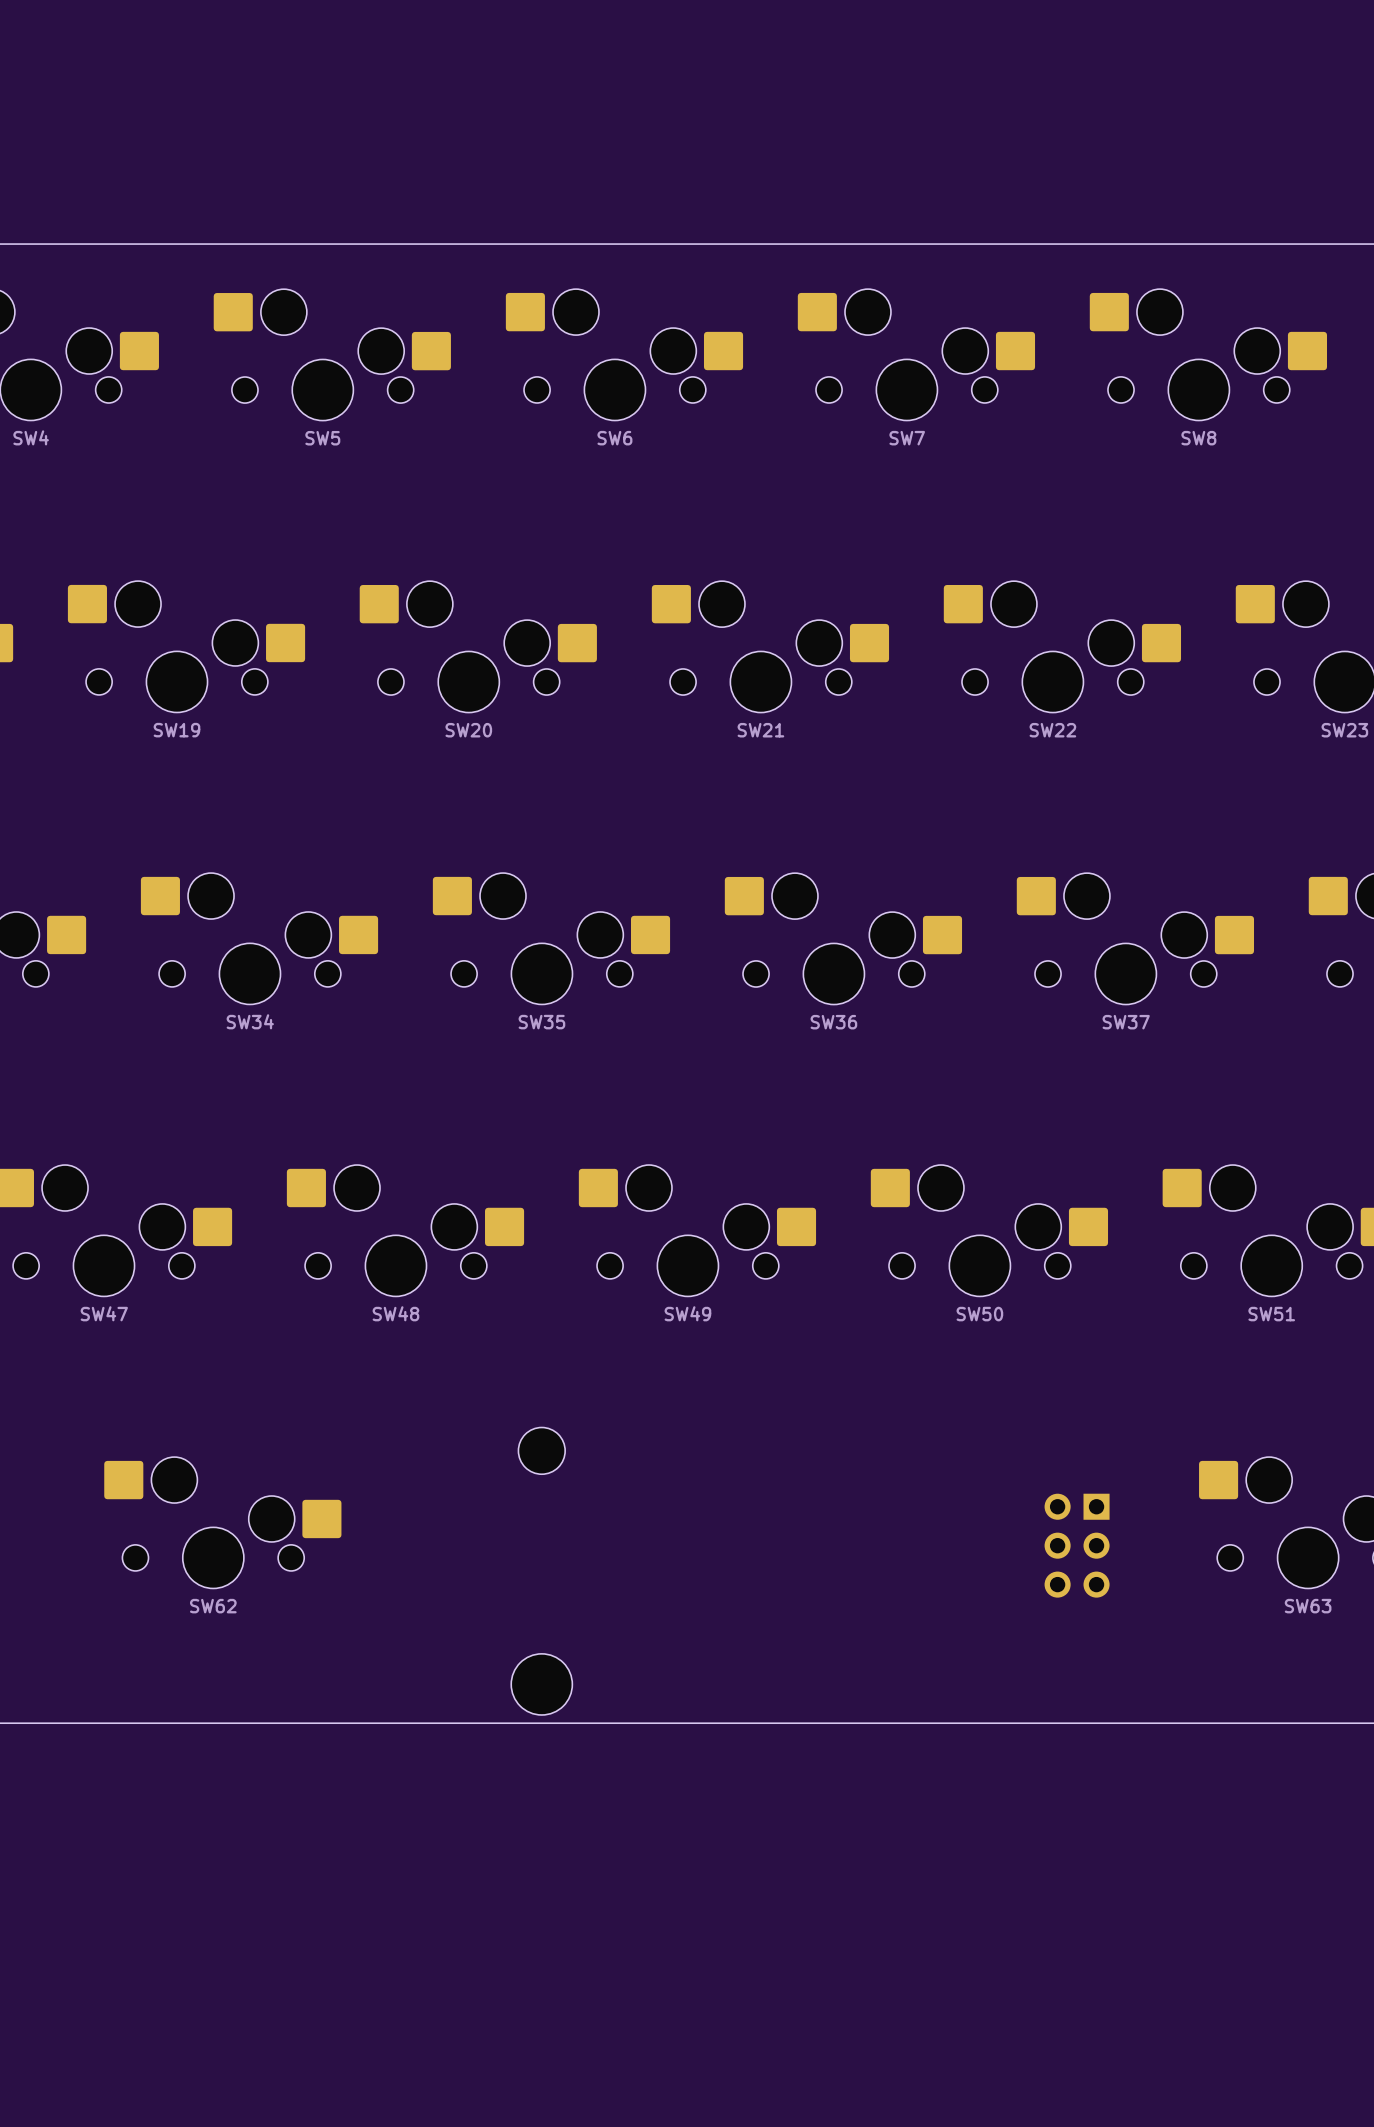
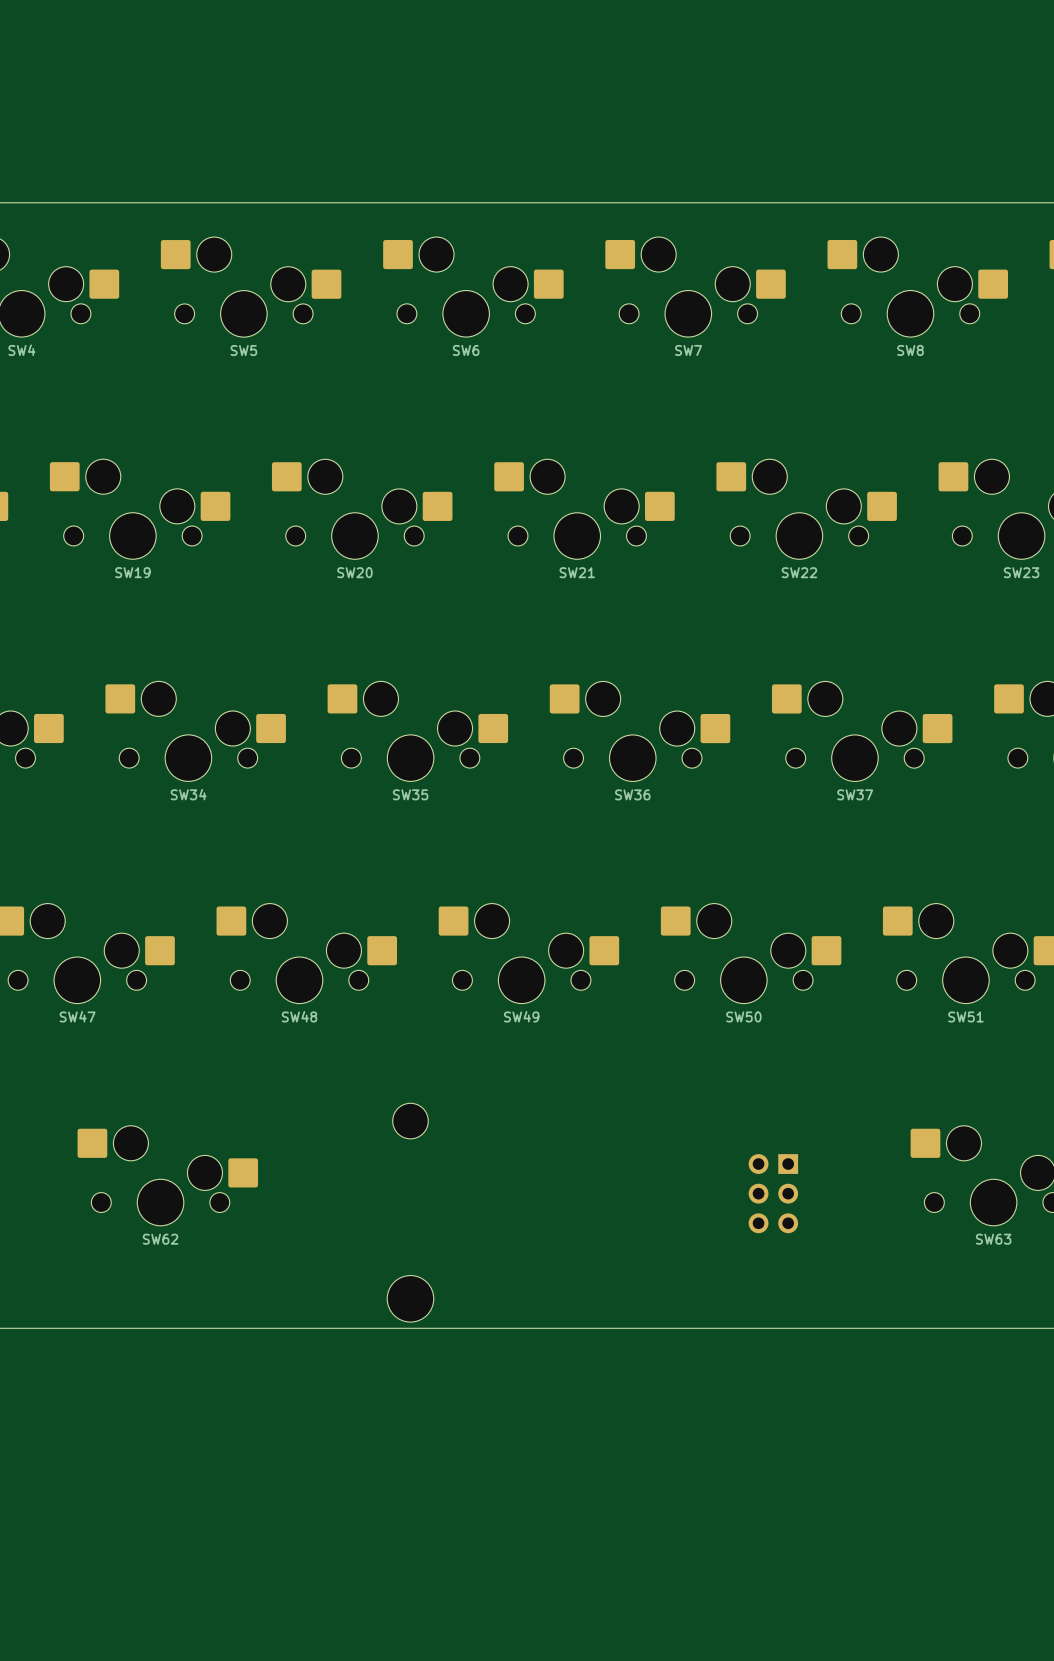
part position: (1077, 1545) -> (773, 1193)

